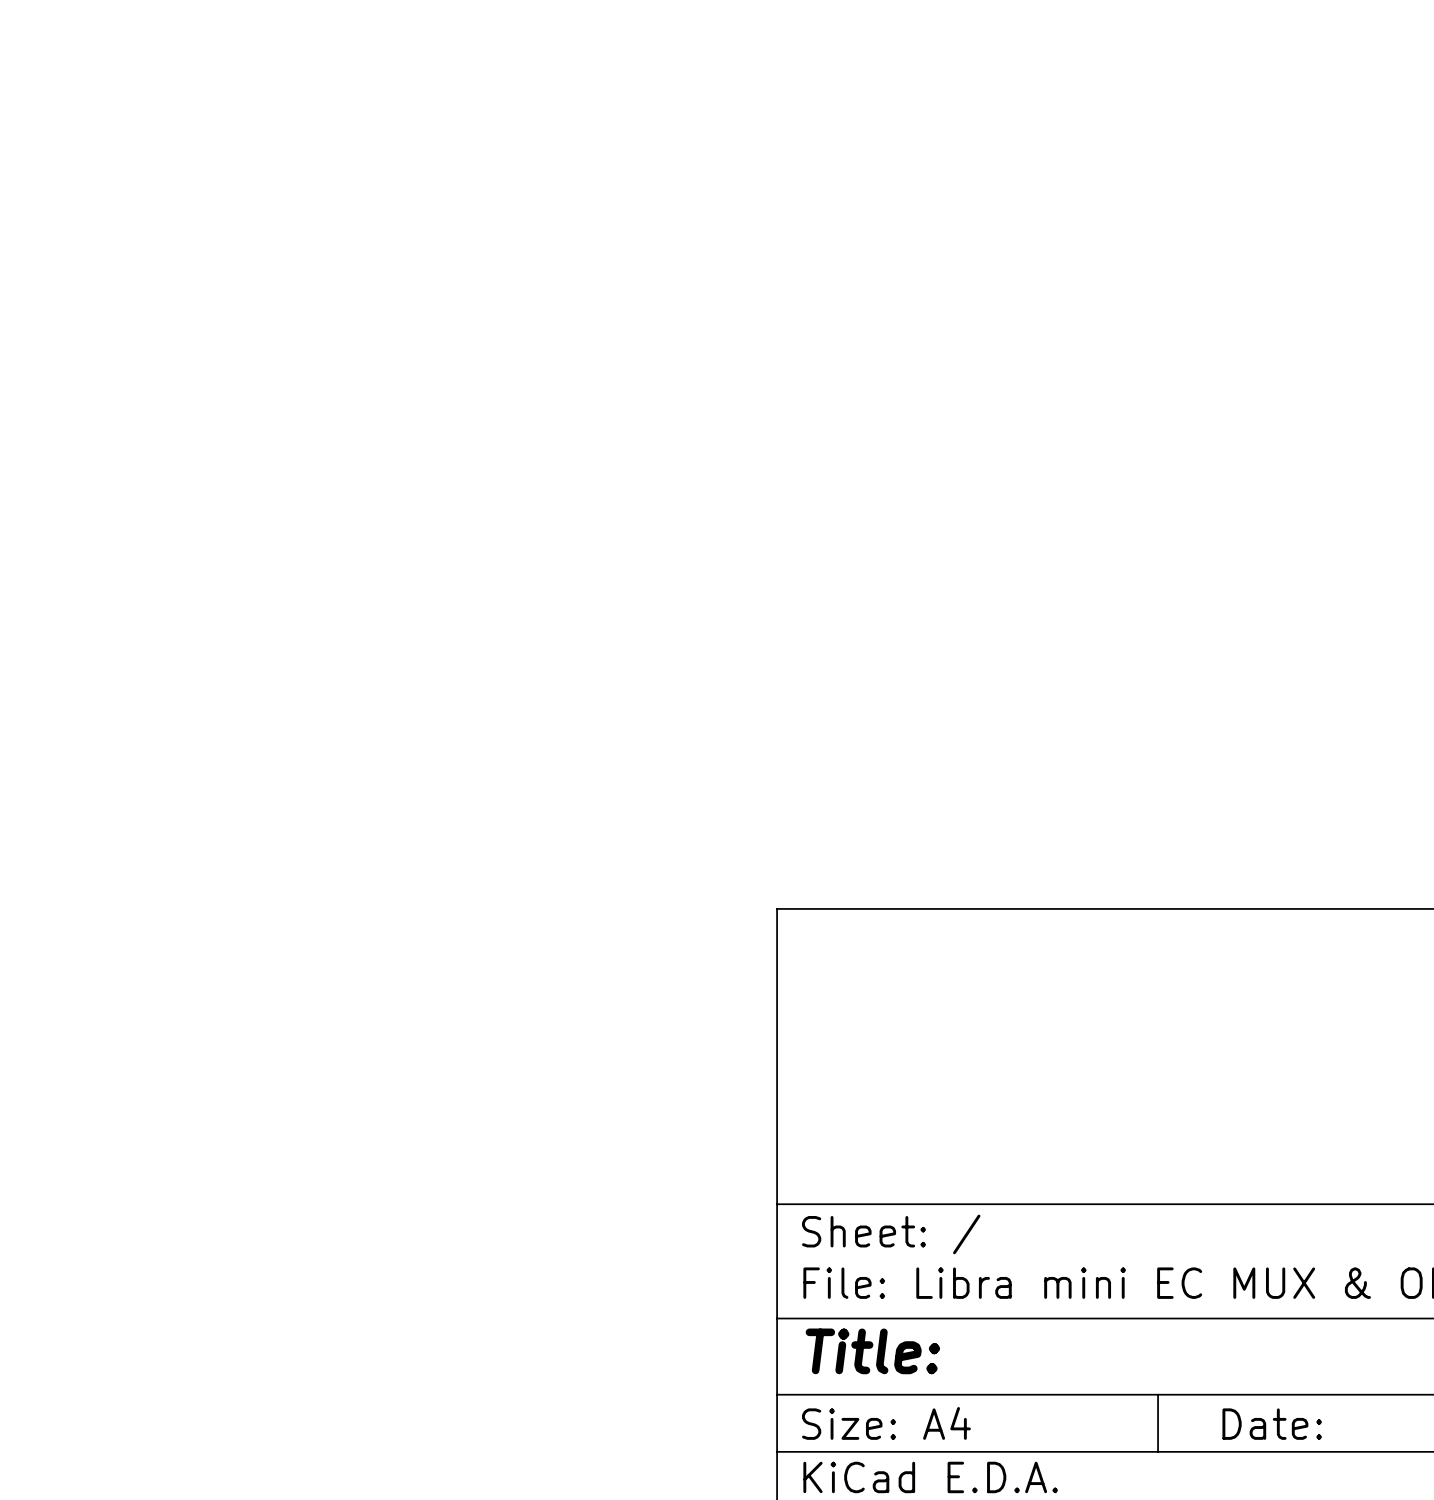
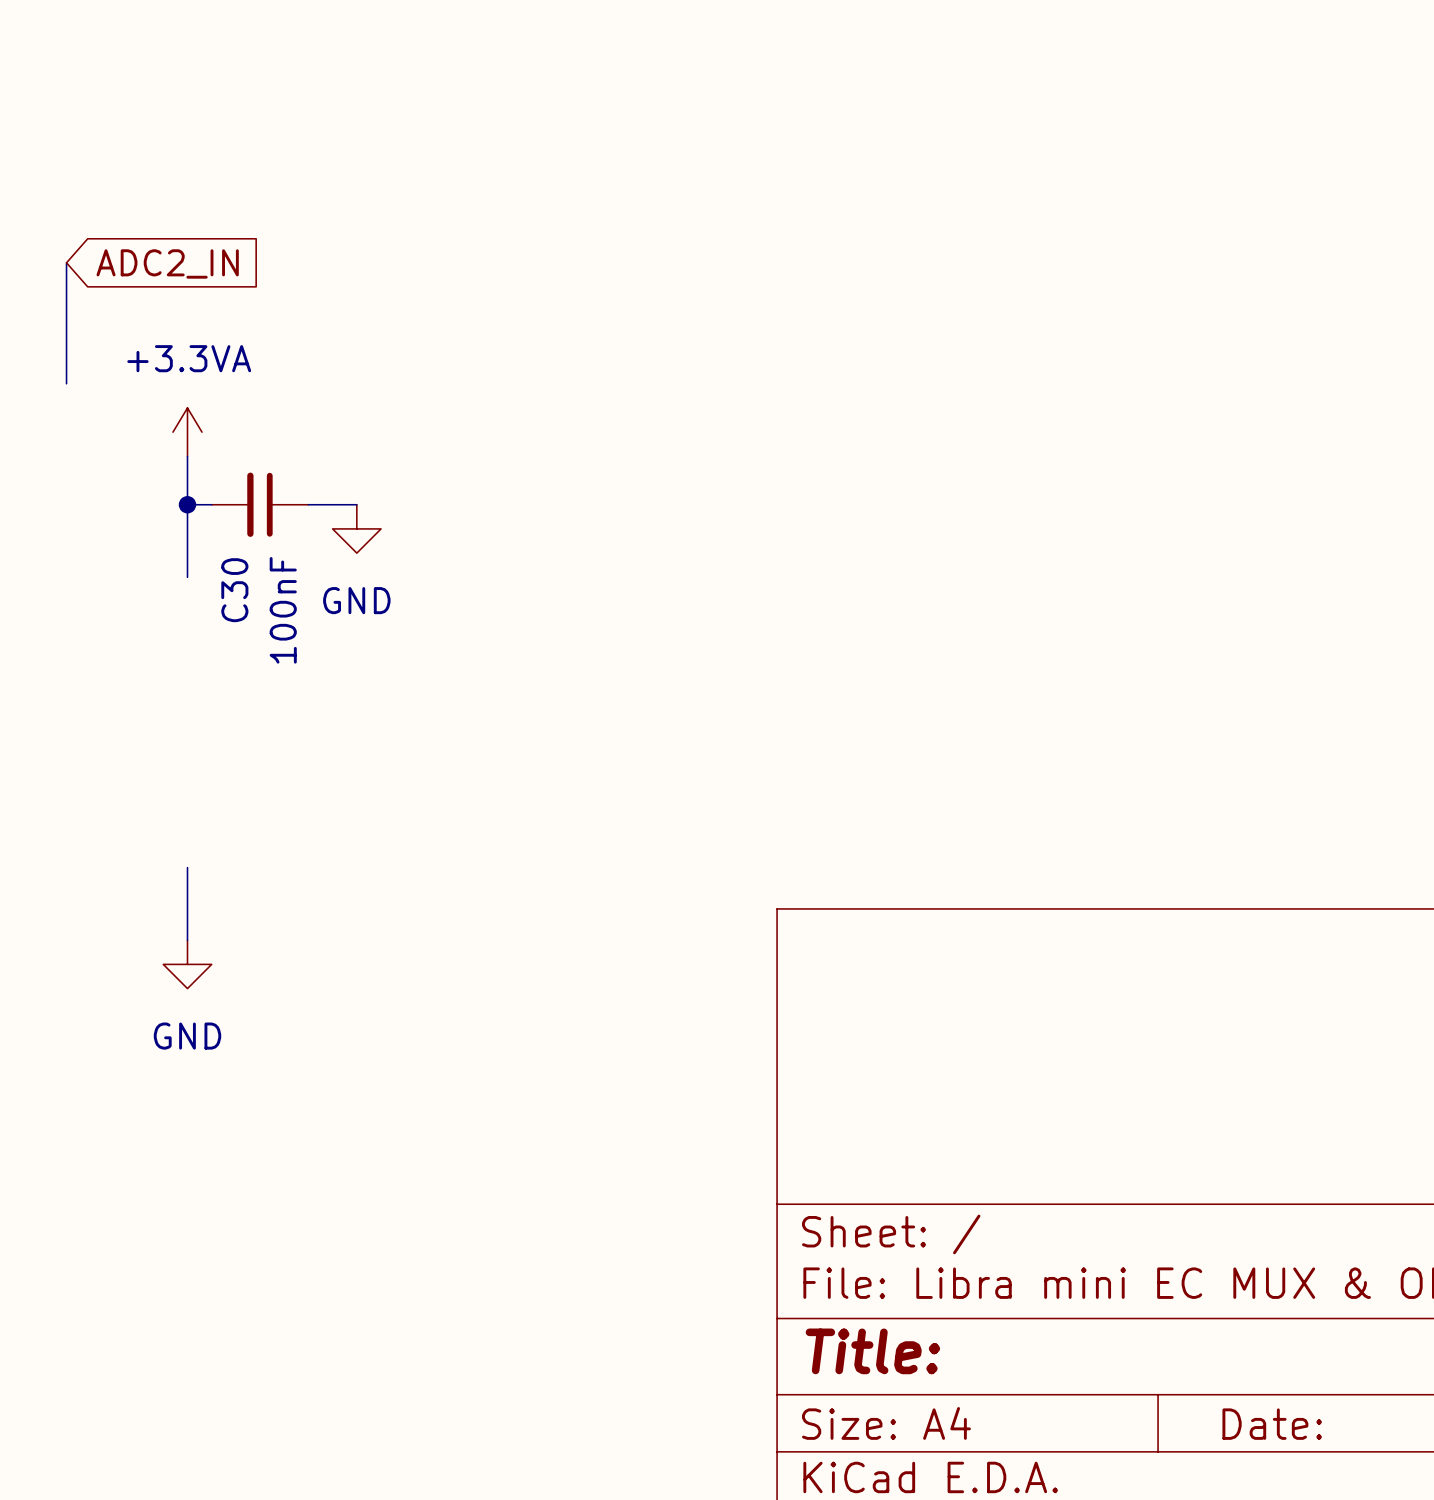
wire: none -> (66, 262) (66, 383)
global label: none -> ADC2_IN (167, 263)
power symbol: none -> +3.3VA (187, 432)
wire: none -> (187, 456) (187, 577)
wire: none -> (187, 504) (211, 504)
junction: none -> (187, 504)
C30: none -> 100nF (260, 504)
wire: none -> (308, 504) (356, 504)
power symbol: none -> GND (356, 528)
wire: none -> (187, 867) (187, 940)
power symbol: none -> GND (187, 964)

